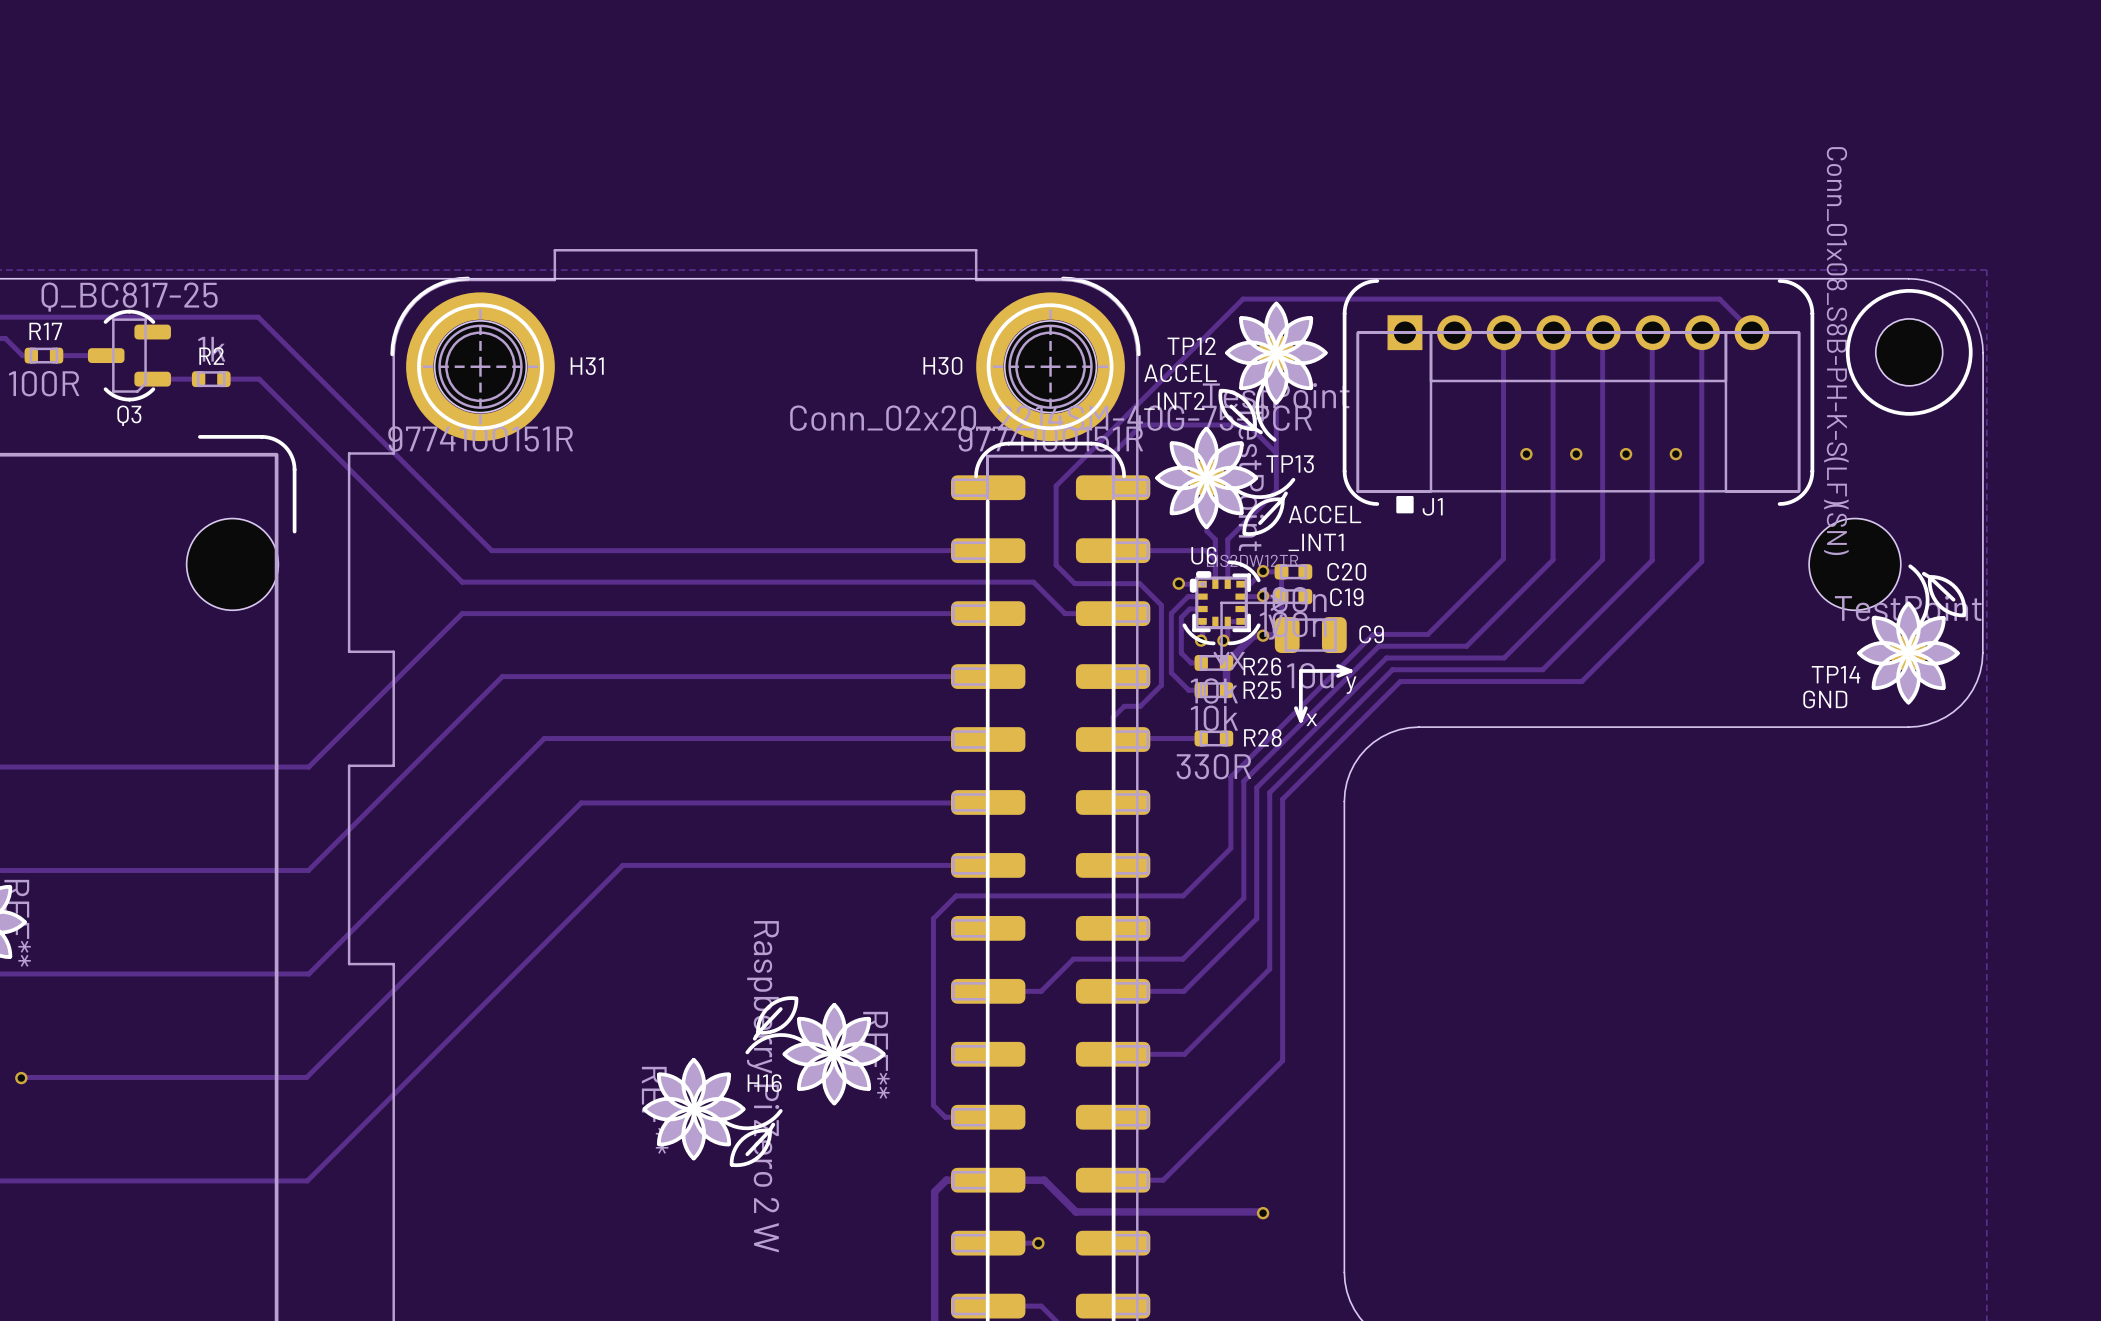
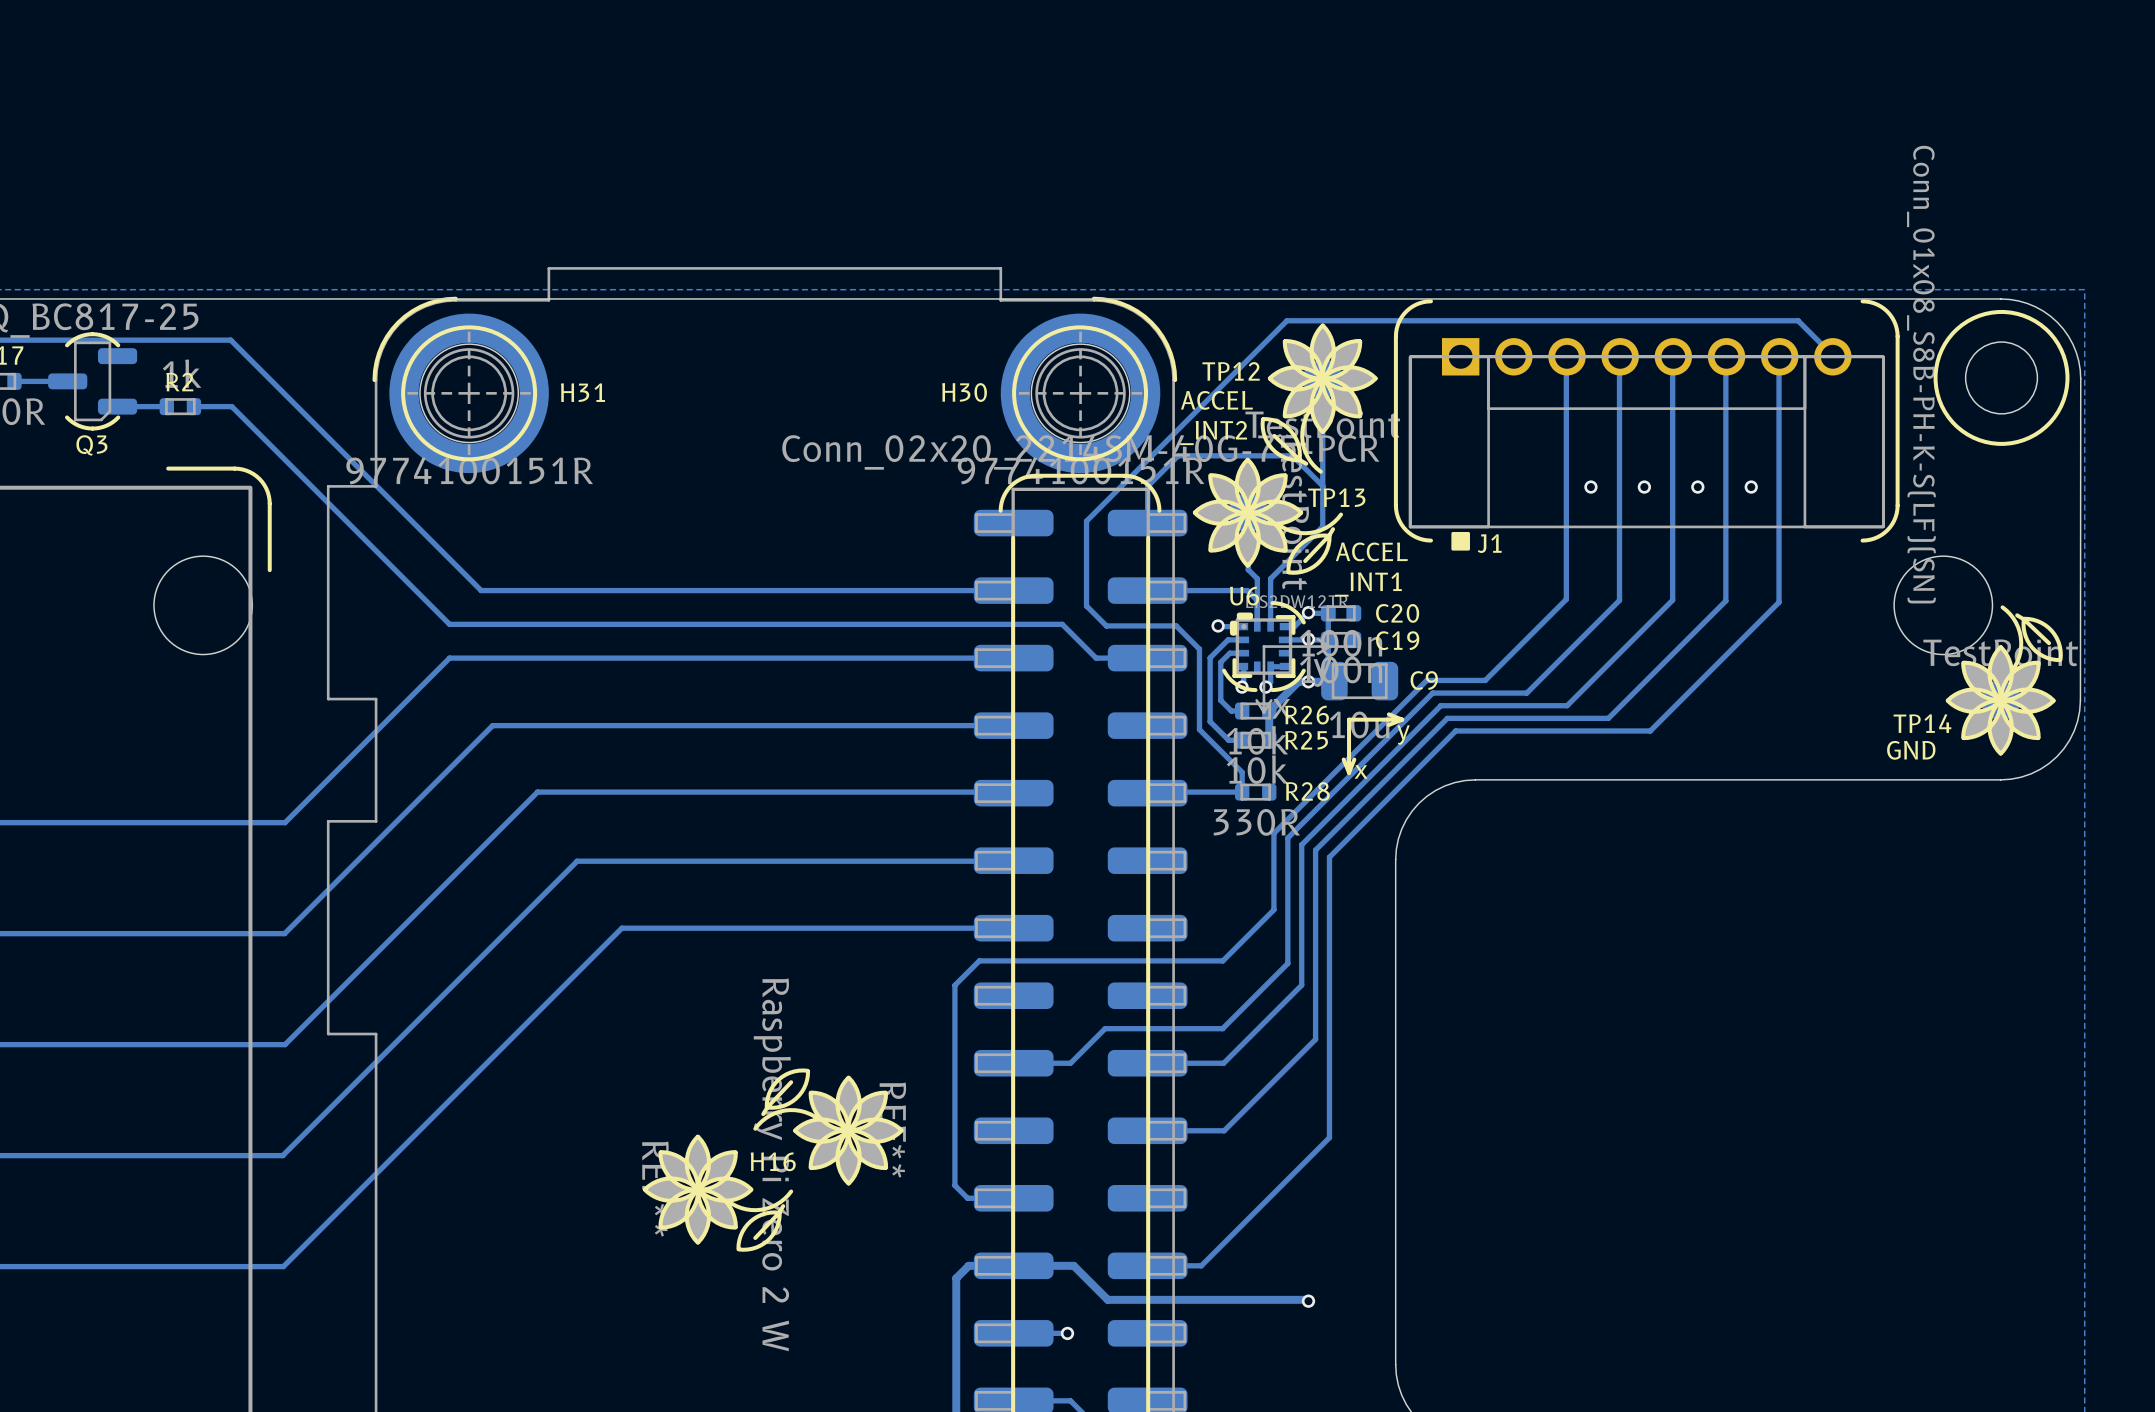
track: (1161, 680) (1161, 685) (1140, 706) (1124, 706) (1113, 717) (1113, 739) -> (1199, 729) (1242, 772) (1242, 792)

